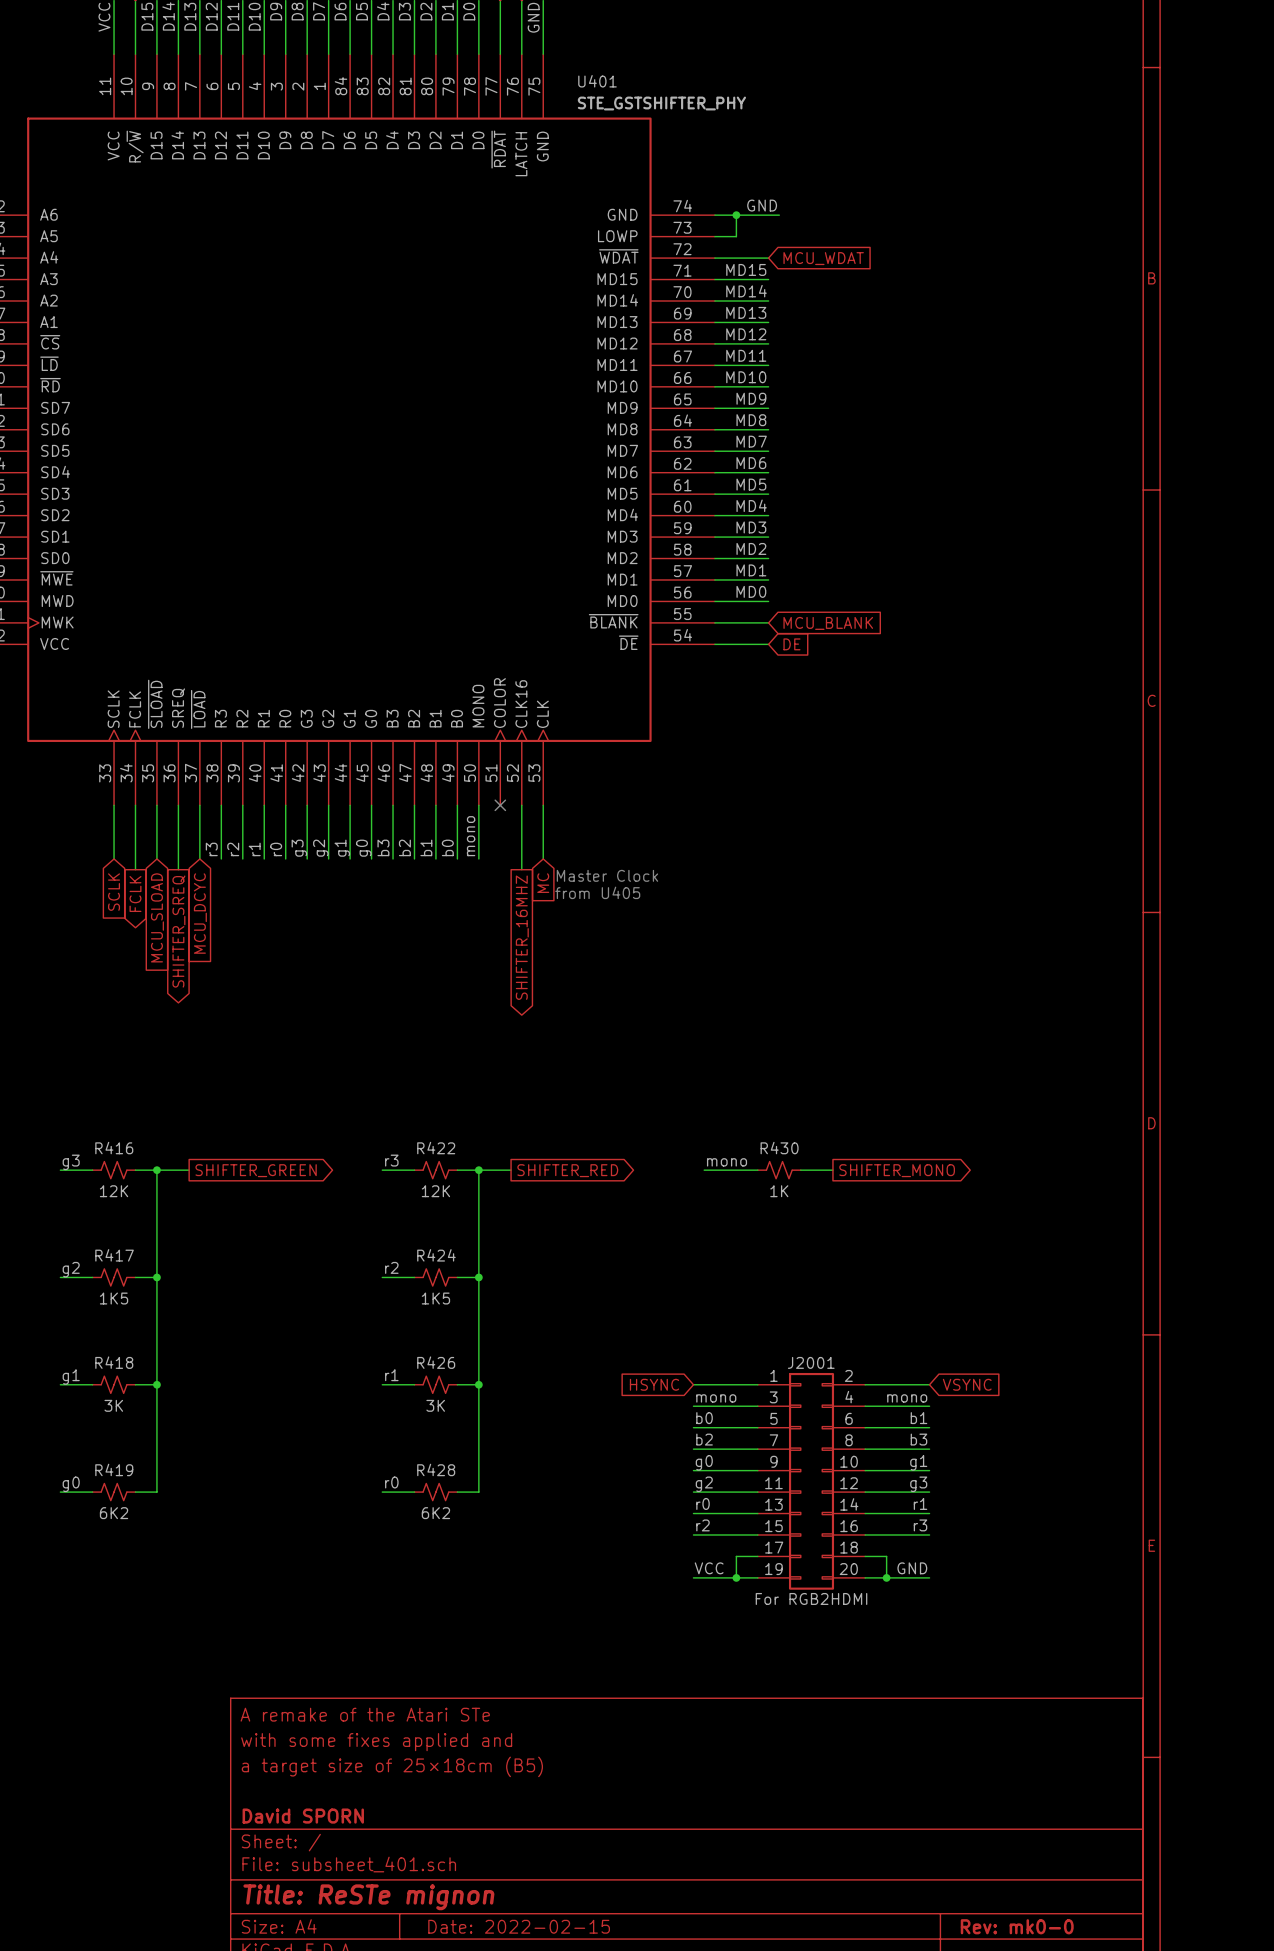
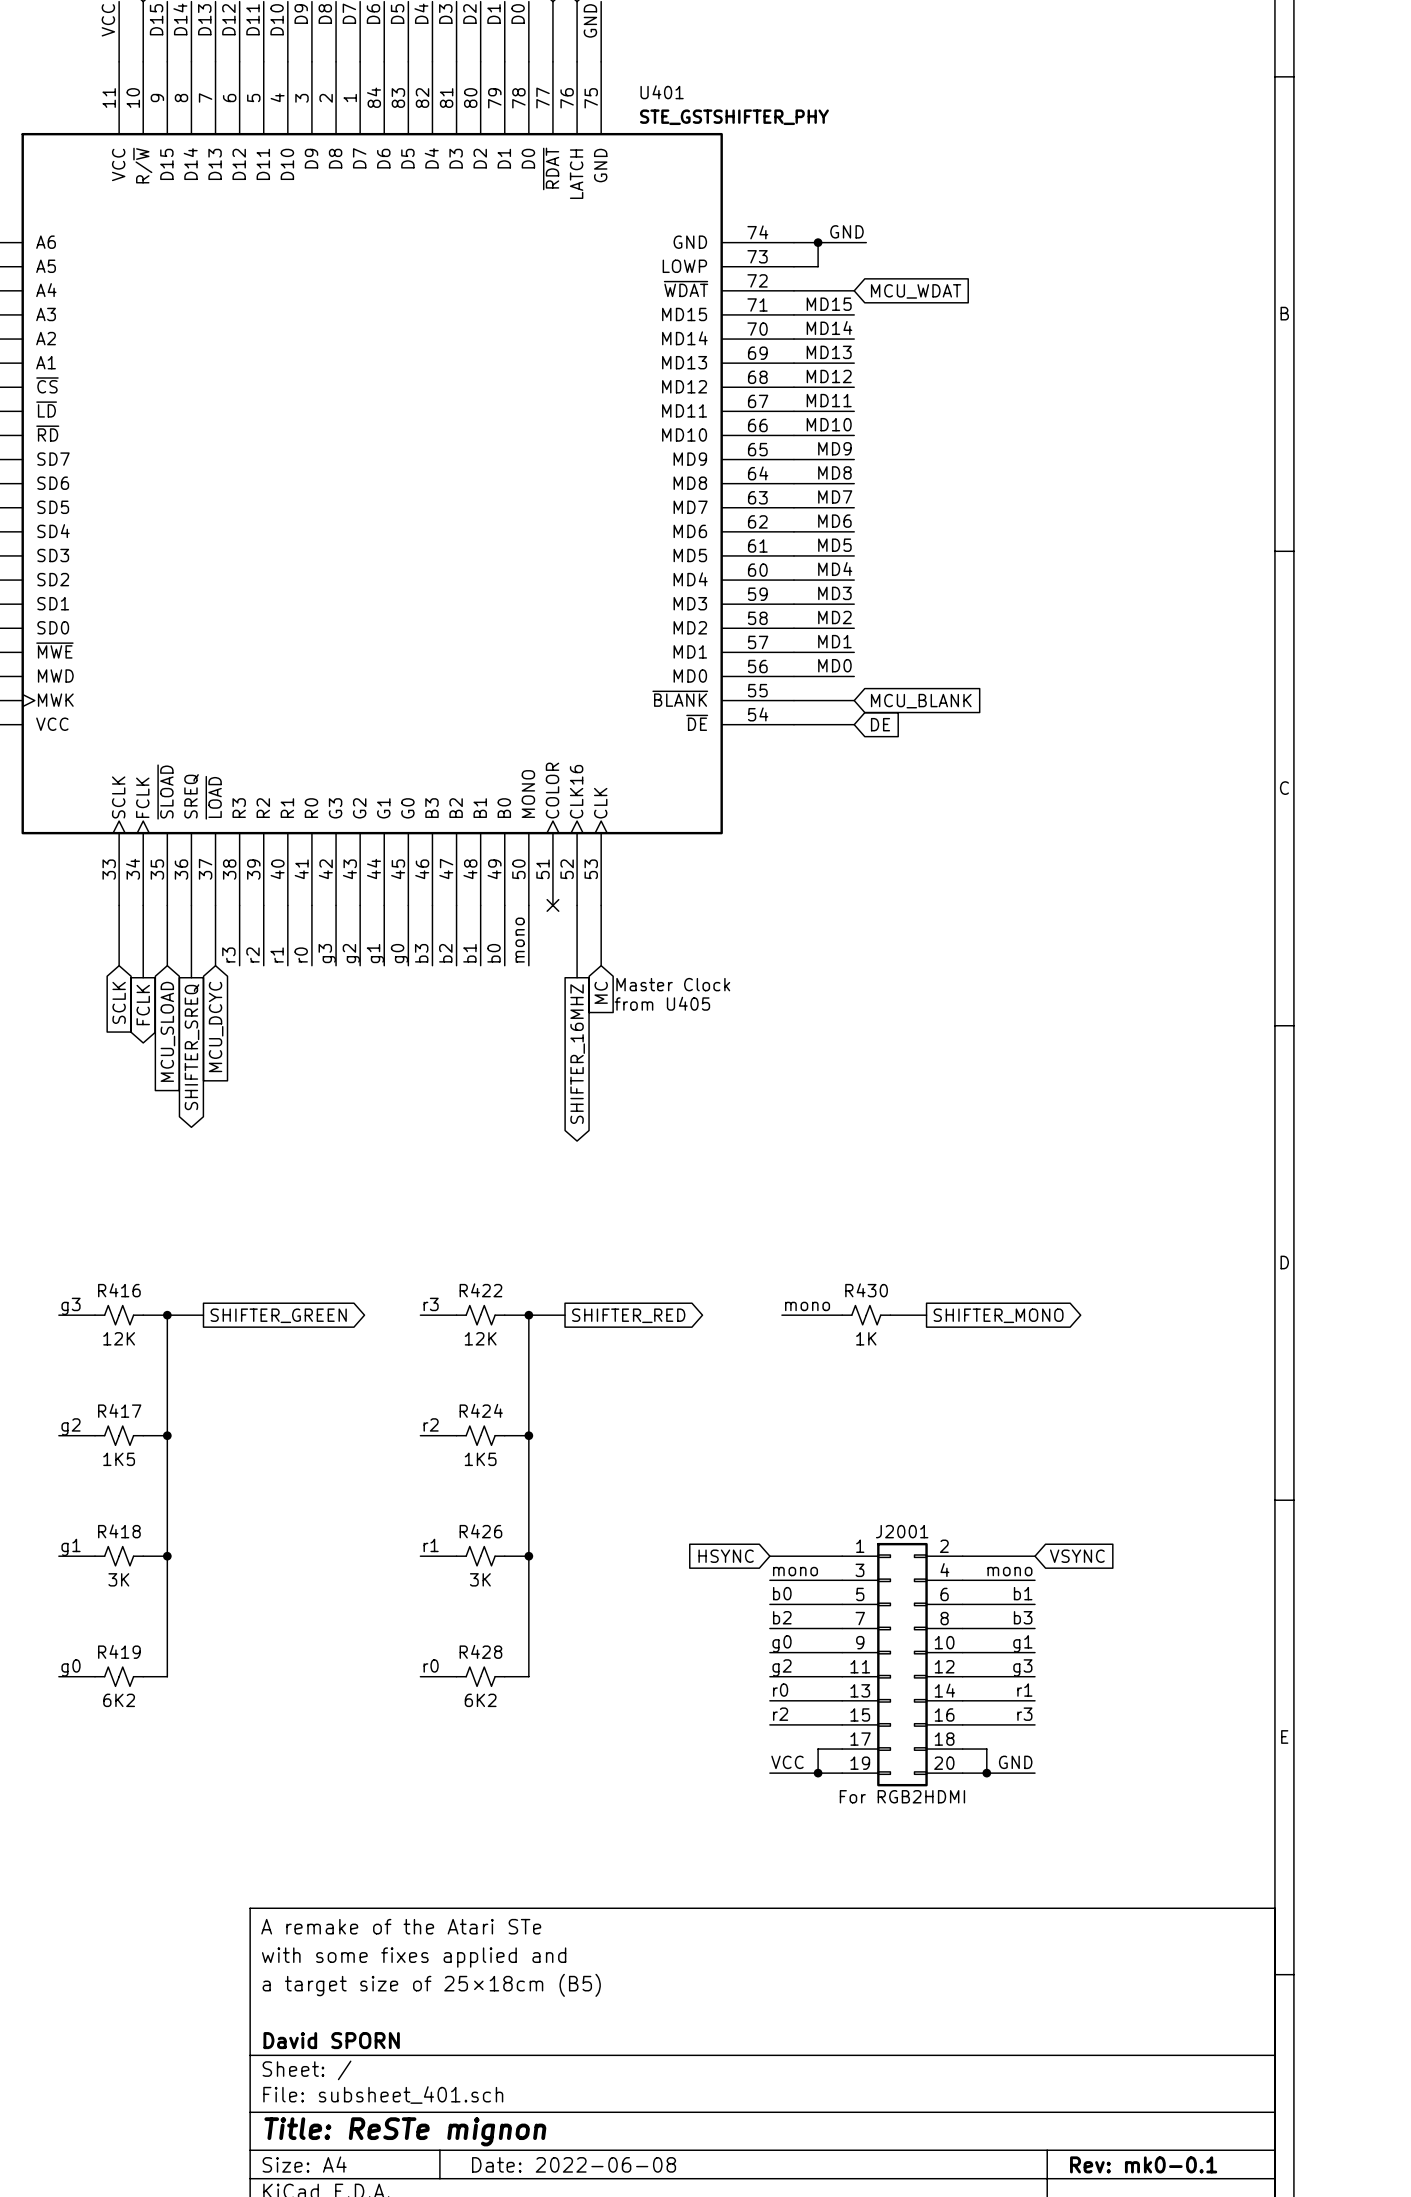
title block: Date: 2022-02-15 (519, 1926) -> Date: 2022-06-08 (574, 2164)
title block: Rev: mk0-0 (1017, 1926) -> Rev: mk0-0.1 (1143, 2164)

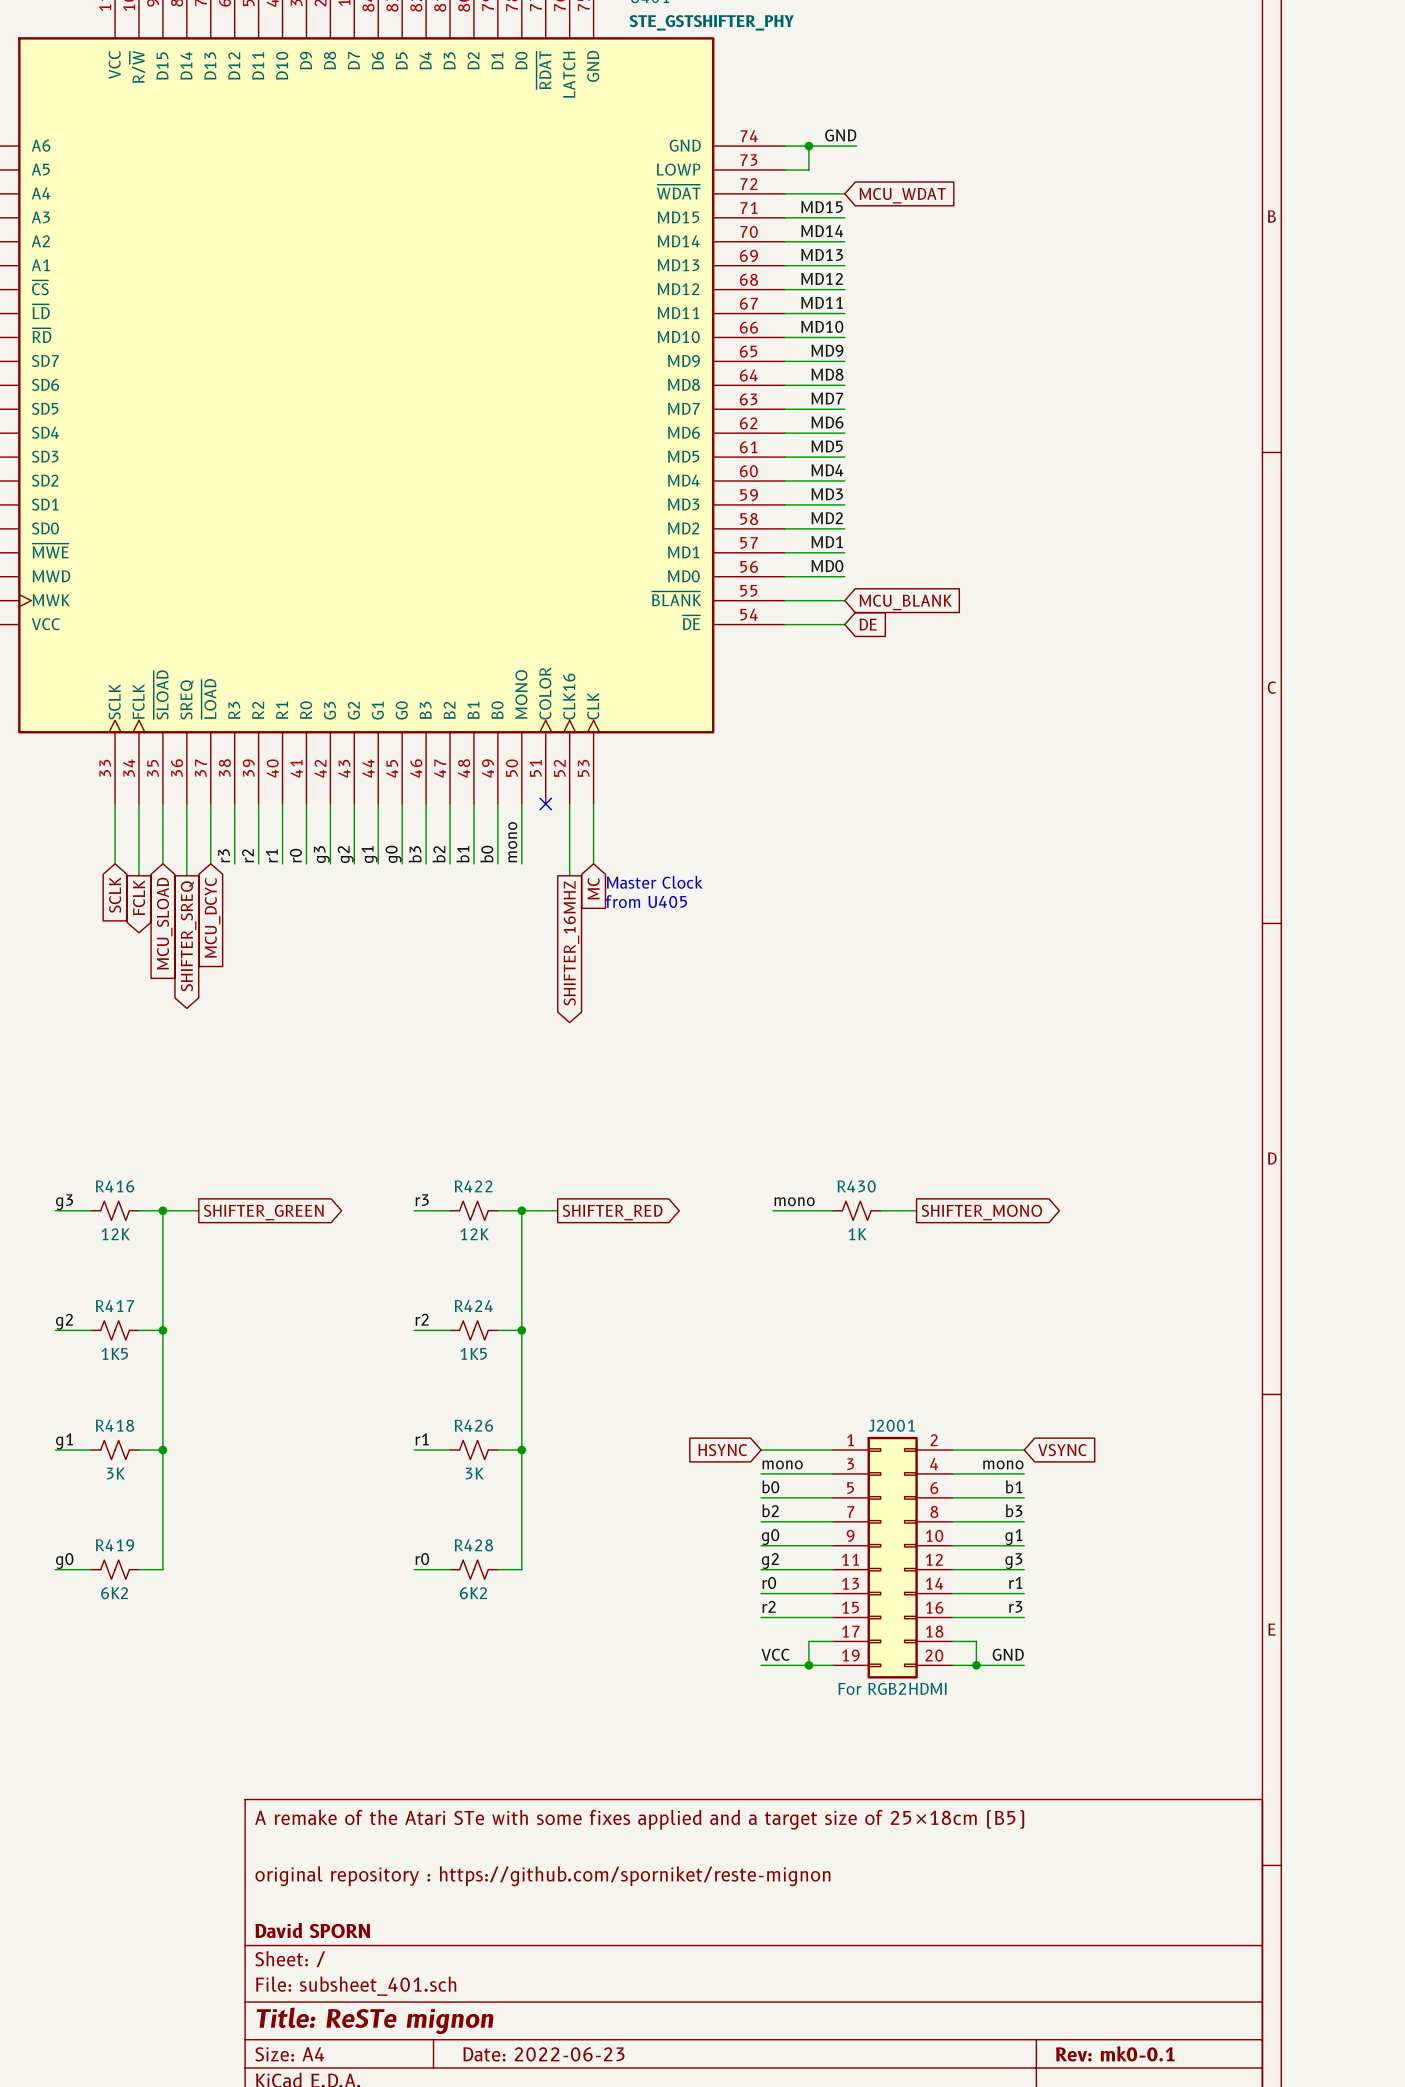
title block: A remake of the Atari STe (401, 1926) -> A remake of the Atari STe with some fixes applied and a target size of 25×18cm (B5) (639, 1819)
title block: with some fixes applied and (414, 1957) -> none
title block: a target size of 25×18cm (B5) (431, 1985) -> original repository : https://github.com/sporniket/reste-mignon (542, 1876)
title block: Date: 2022-06-08 (574, 2164) -> Date: 2022-06-23 (543, 2054)

